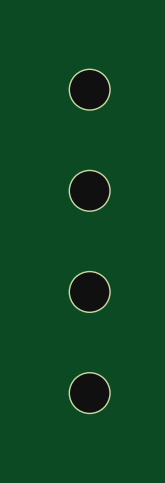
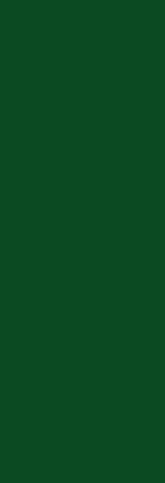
part: (89, 89) -> none
part: (89, 190) -> none
part: (89, 291) -> none
part: (89, 393) -> none

